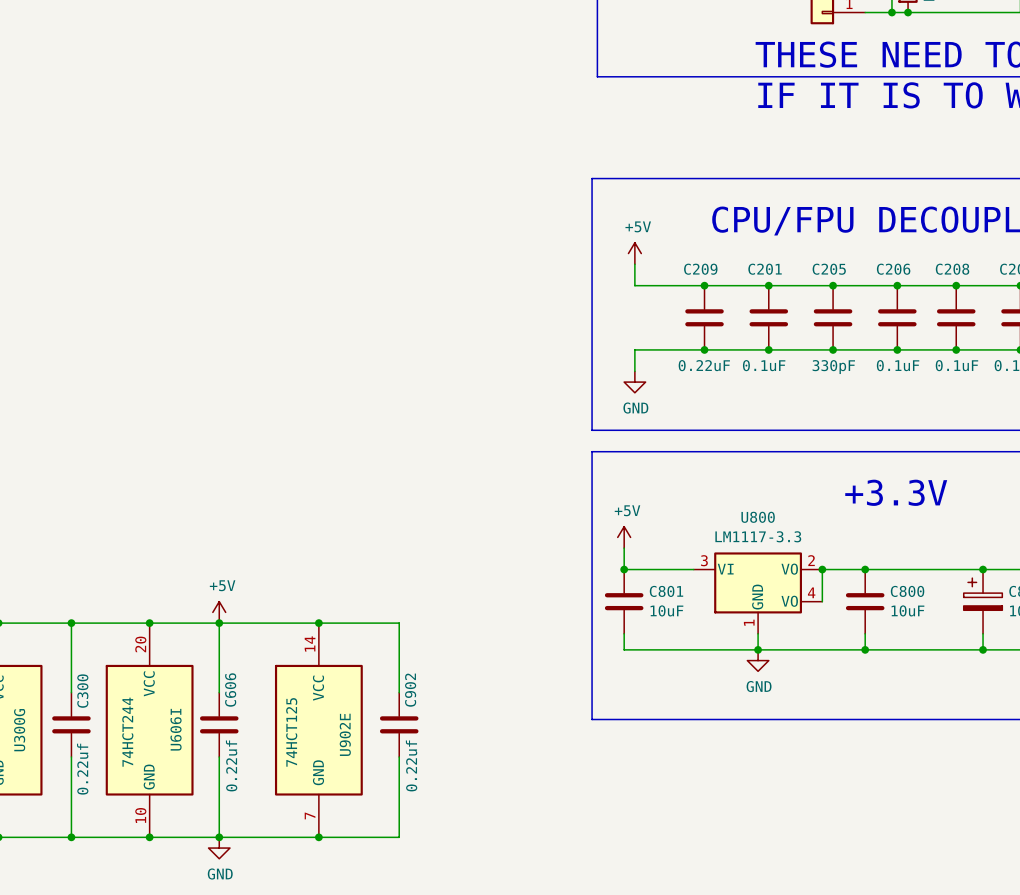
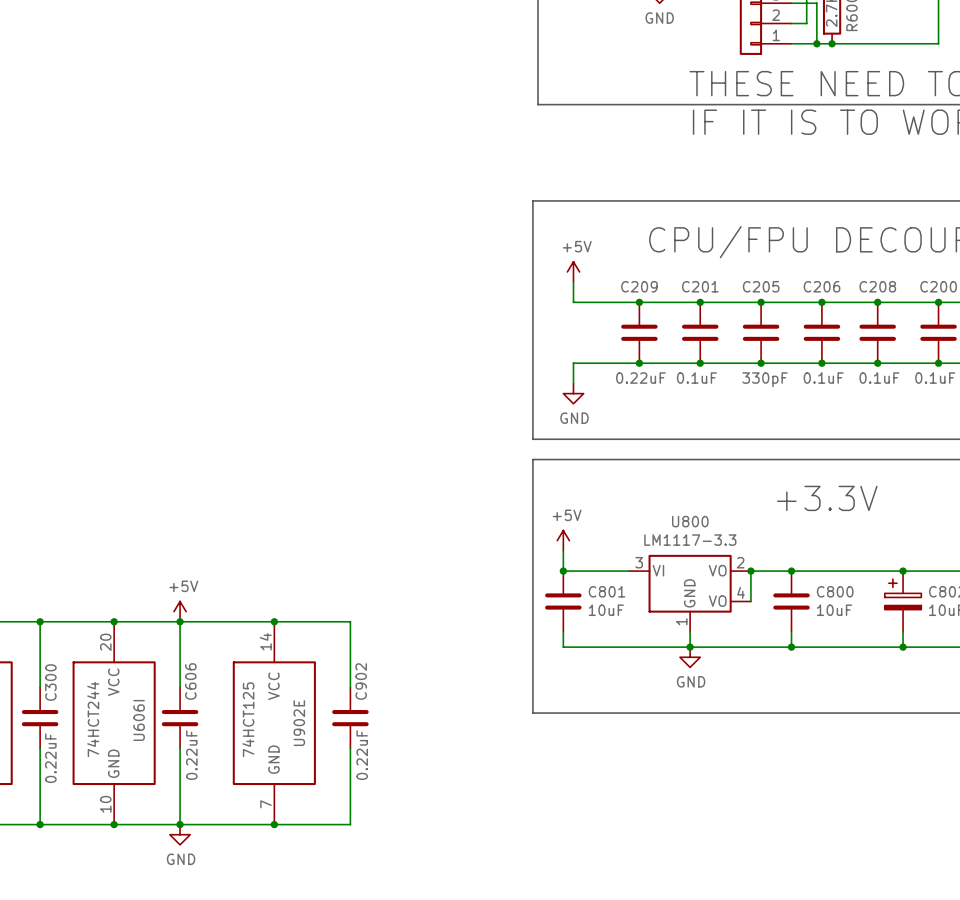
C606 value: 0.22uf (231, 765) -> 0.22uF (191, 755)
C902 value: 0.22uf (411, 765) -> 0.22uF (362, 755)
C300 value: 0.22uf (82, 769) -> 0.22uF (50, 758)

